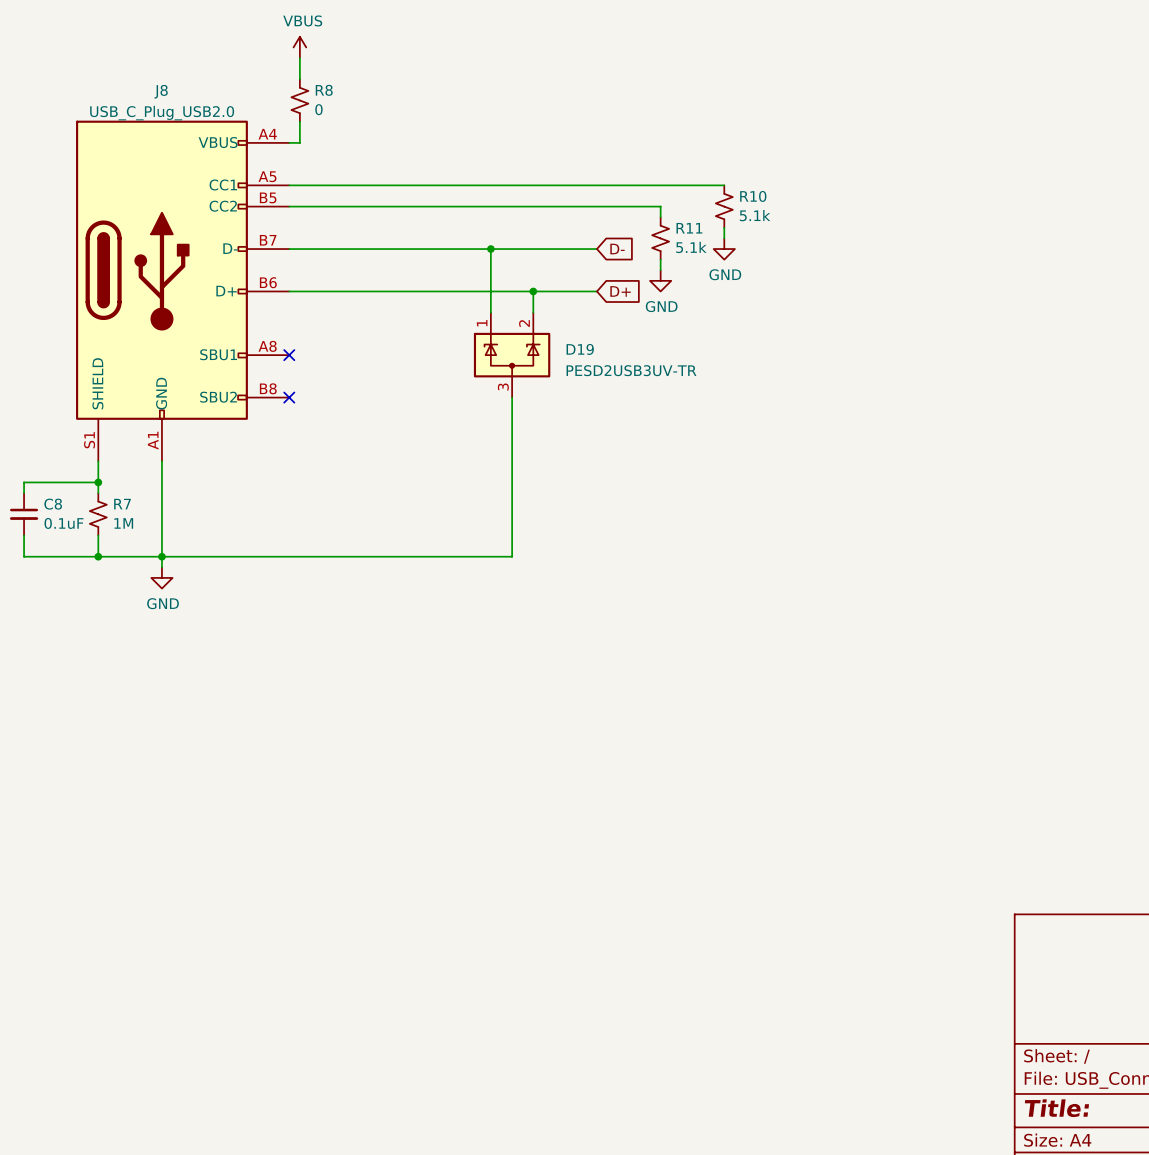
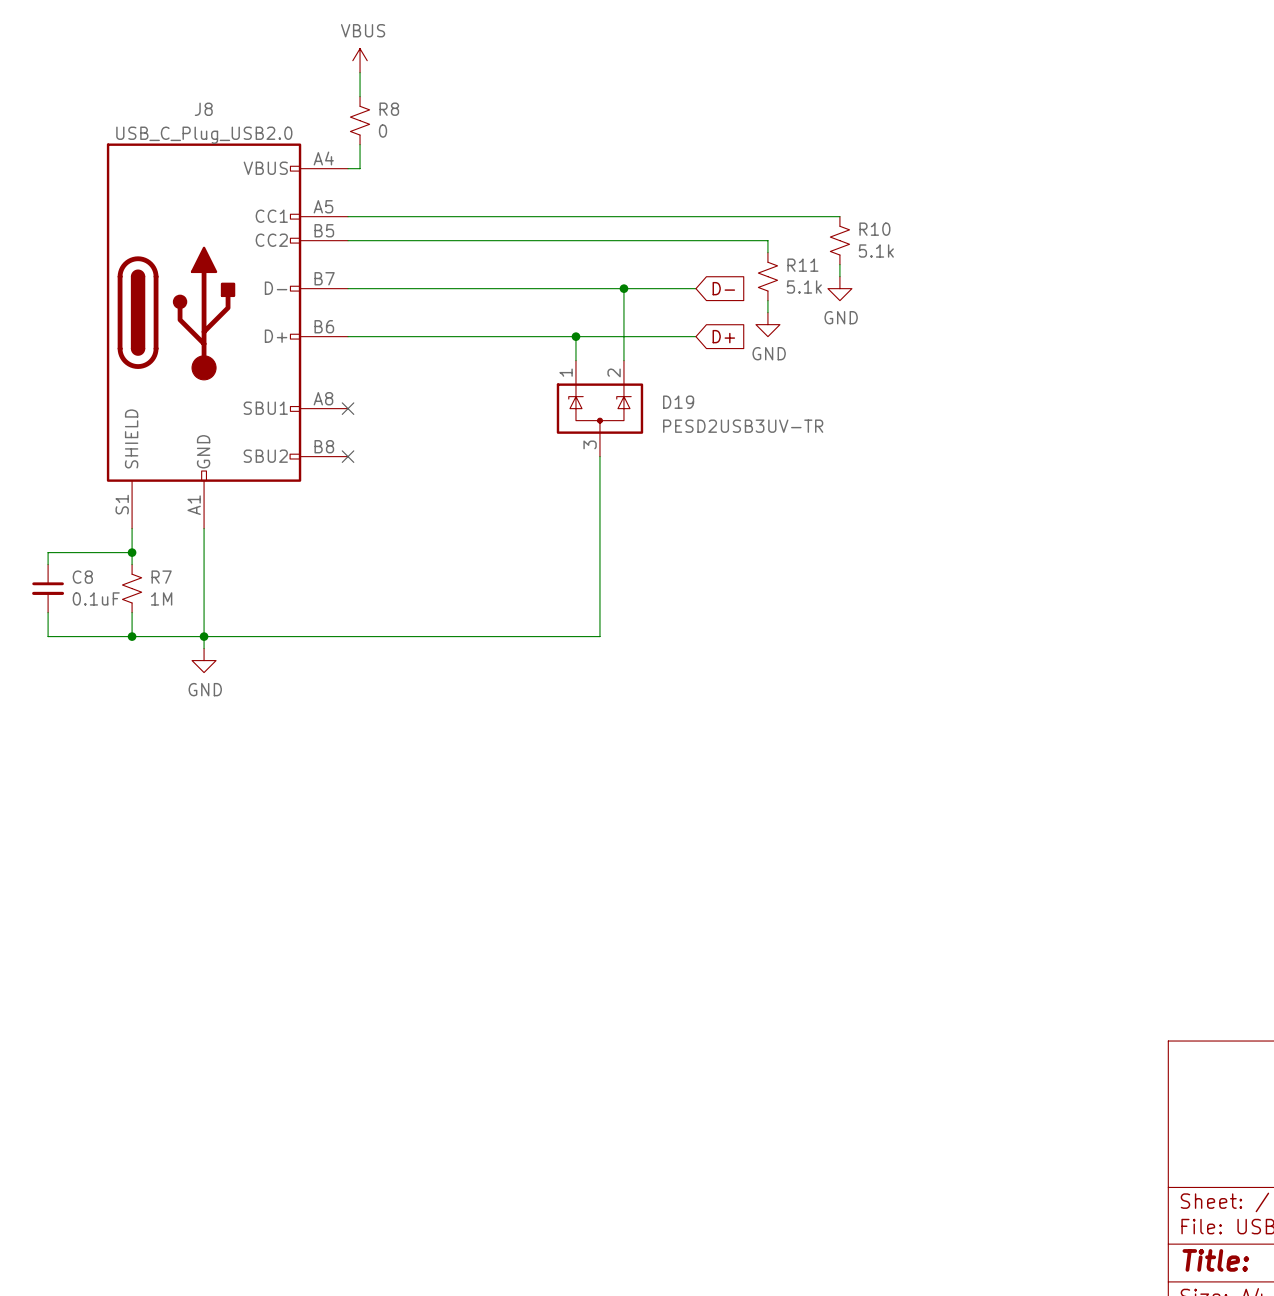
wire: (490, 249) (490, 291) -> (623, 288) (623, 336)
junction: (490, 249) -> none
junction: none -> (623, 288)
junction: none -> (575, 336)
junction: (533, 291) -> none

